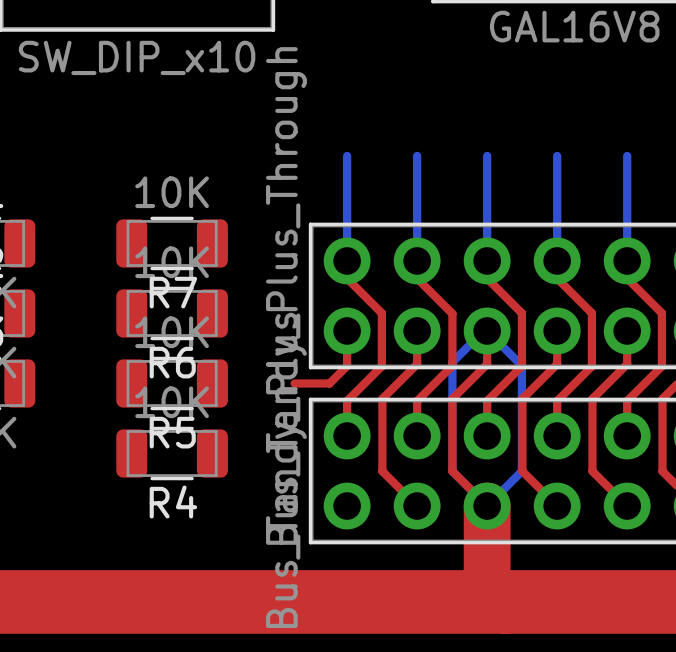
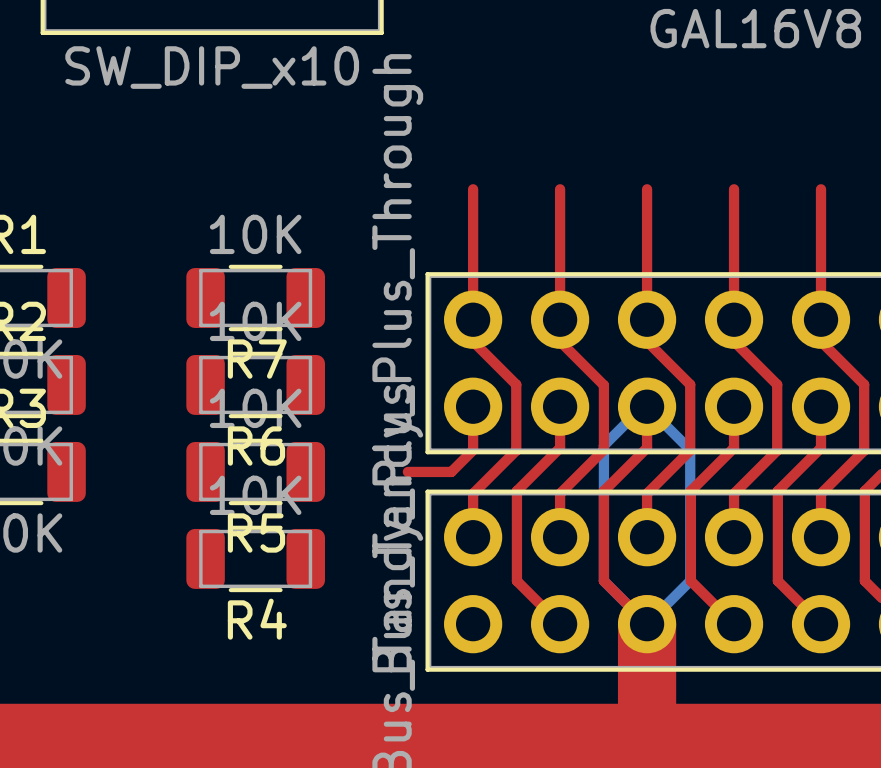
top track: none -> (473, 189) (473, 319)
bottom track: (347, 155) (347, 260) -> none
top track: none -> (560, 189) (560, 319)
bottom track: (417, 155) (417, 260) -> none
top track: none -> (647, 189) (647, 319)
bottom track: (487, 155) (487, 260) -> none
top track: none -> (734, 189) (734, 319)
bottom track: (557, 155) (557, 260) -> none
top track: none -> (821, 189) (821, 319)
bottom track: (627, 155) (627, 260) -> none

